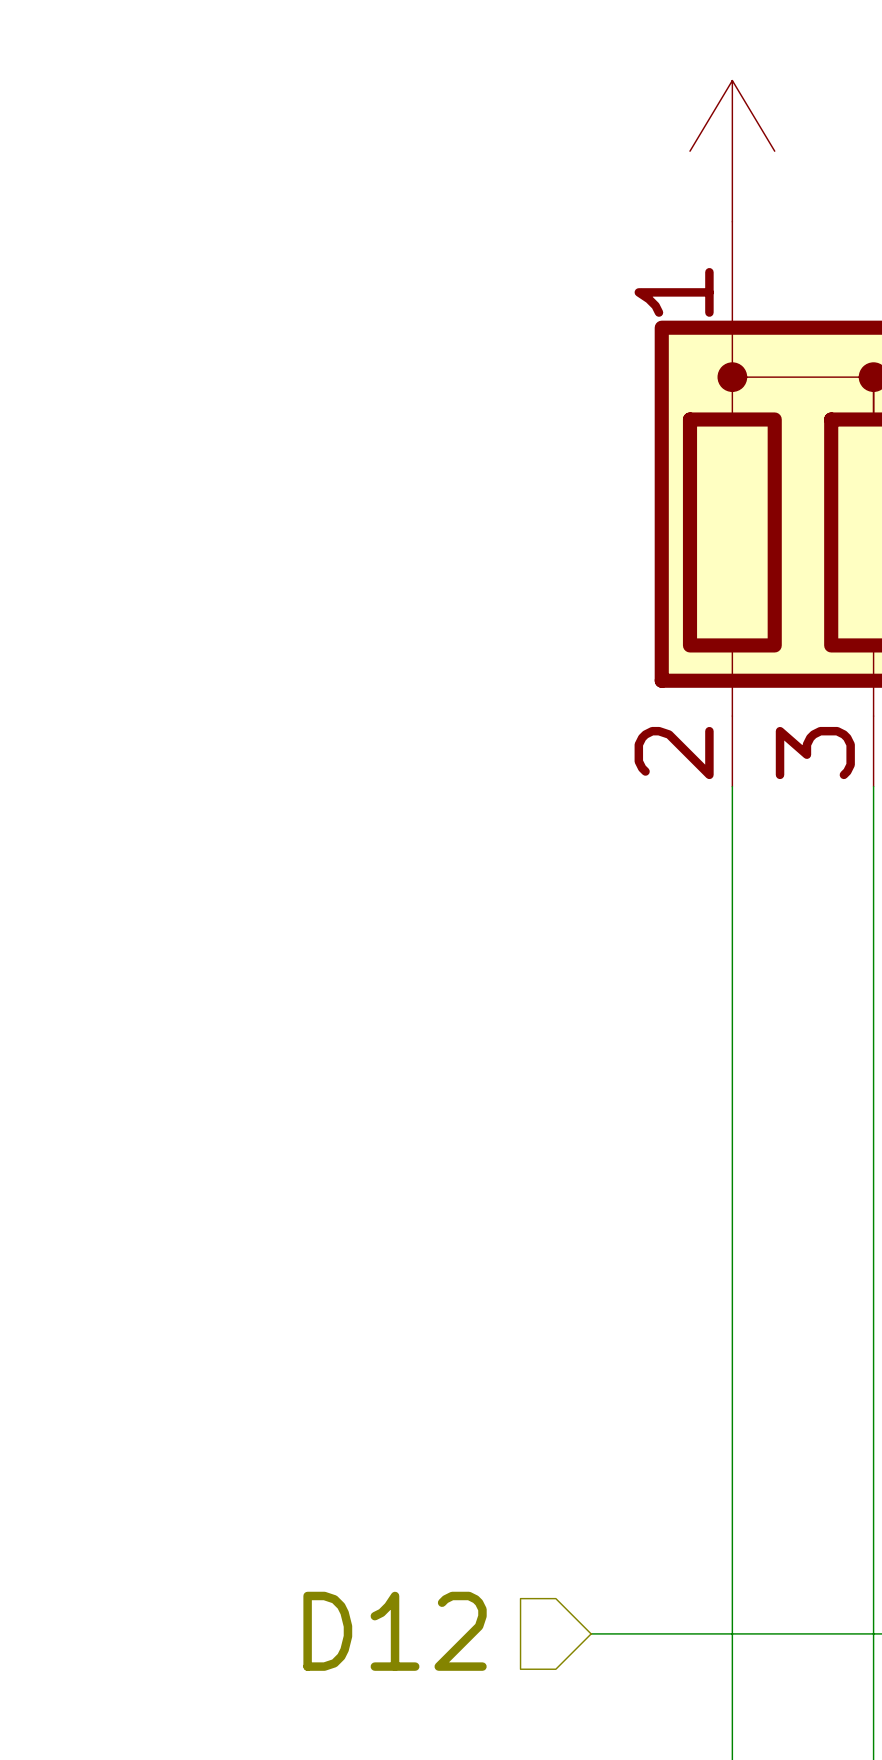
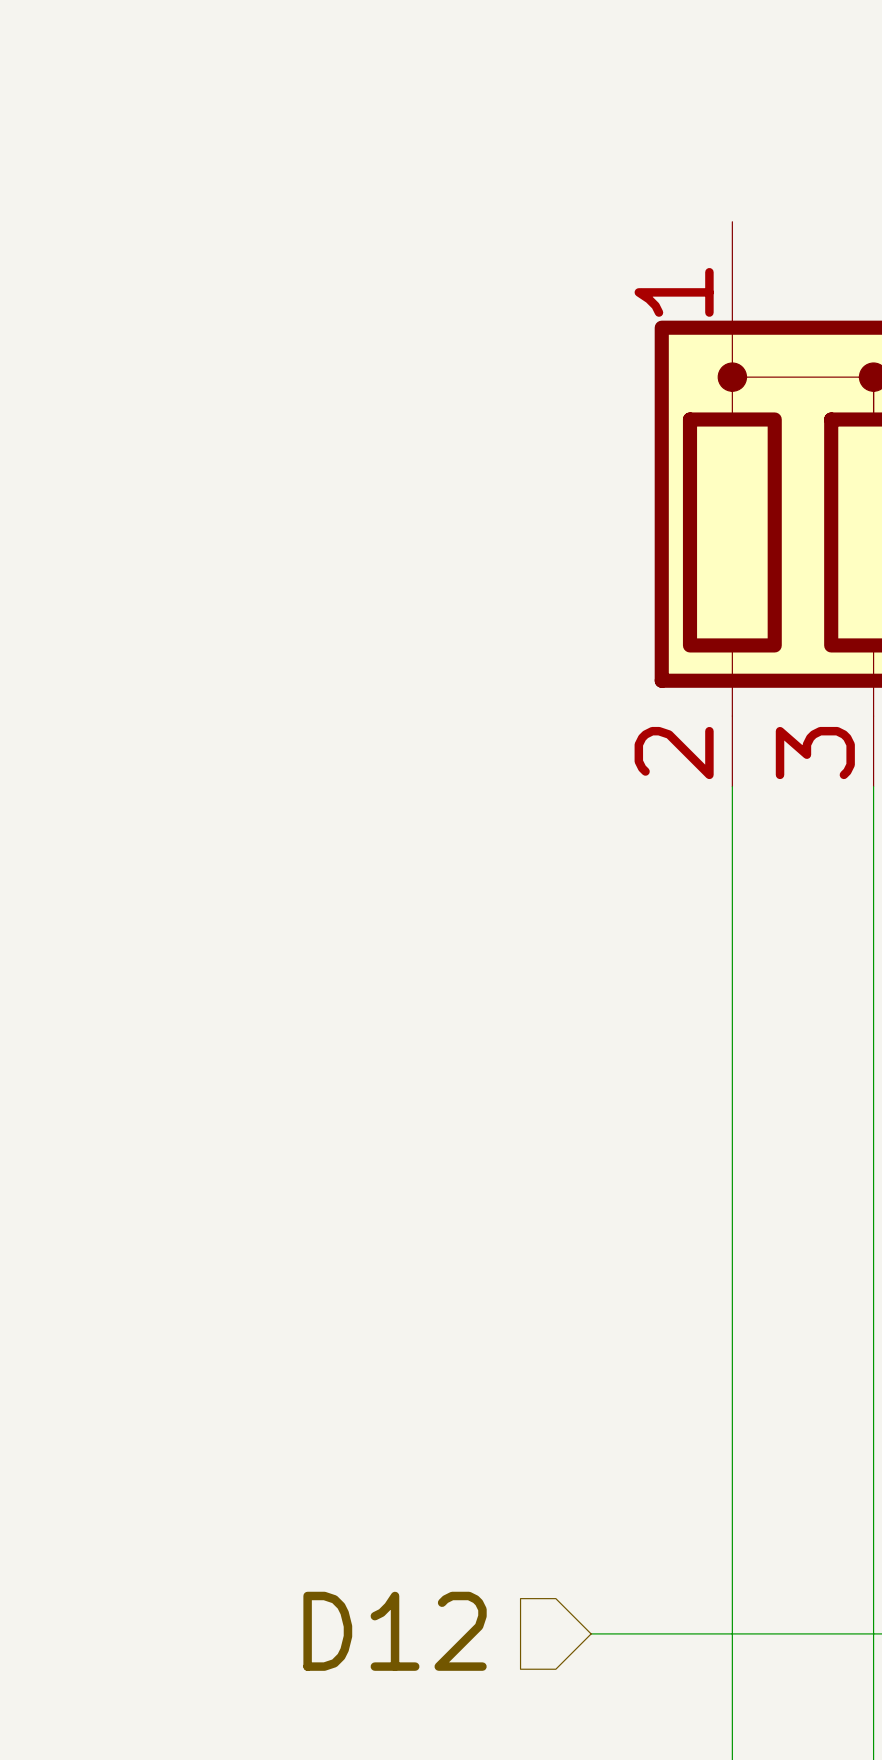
power symbol: (732, 151) -> none

